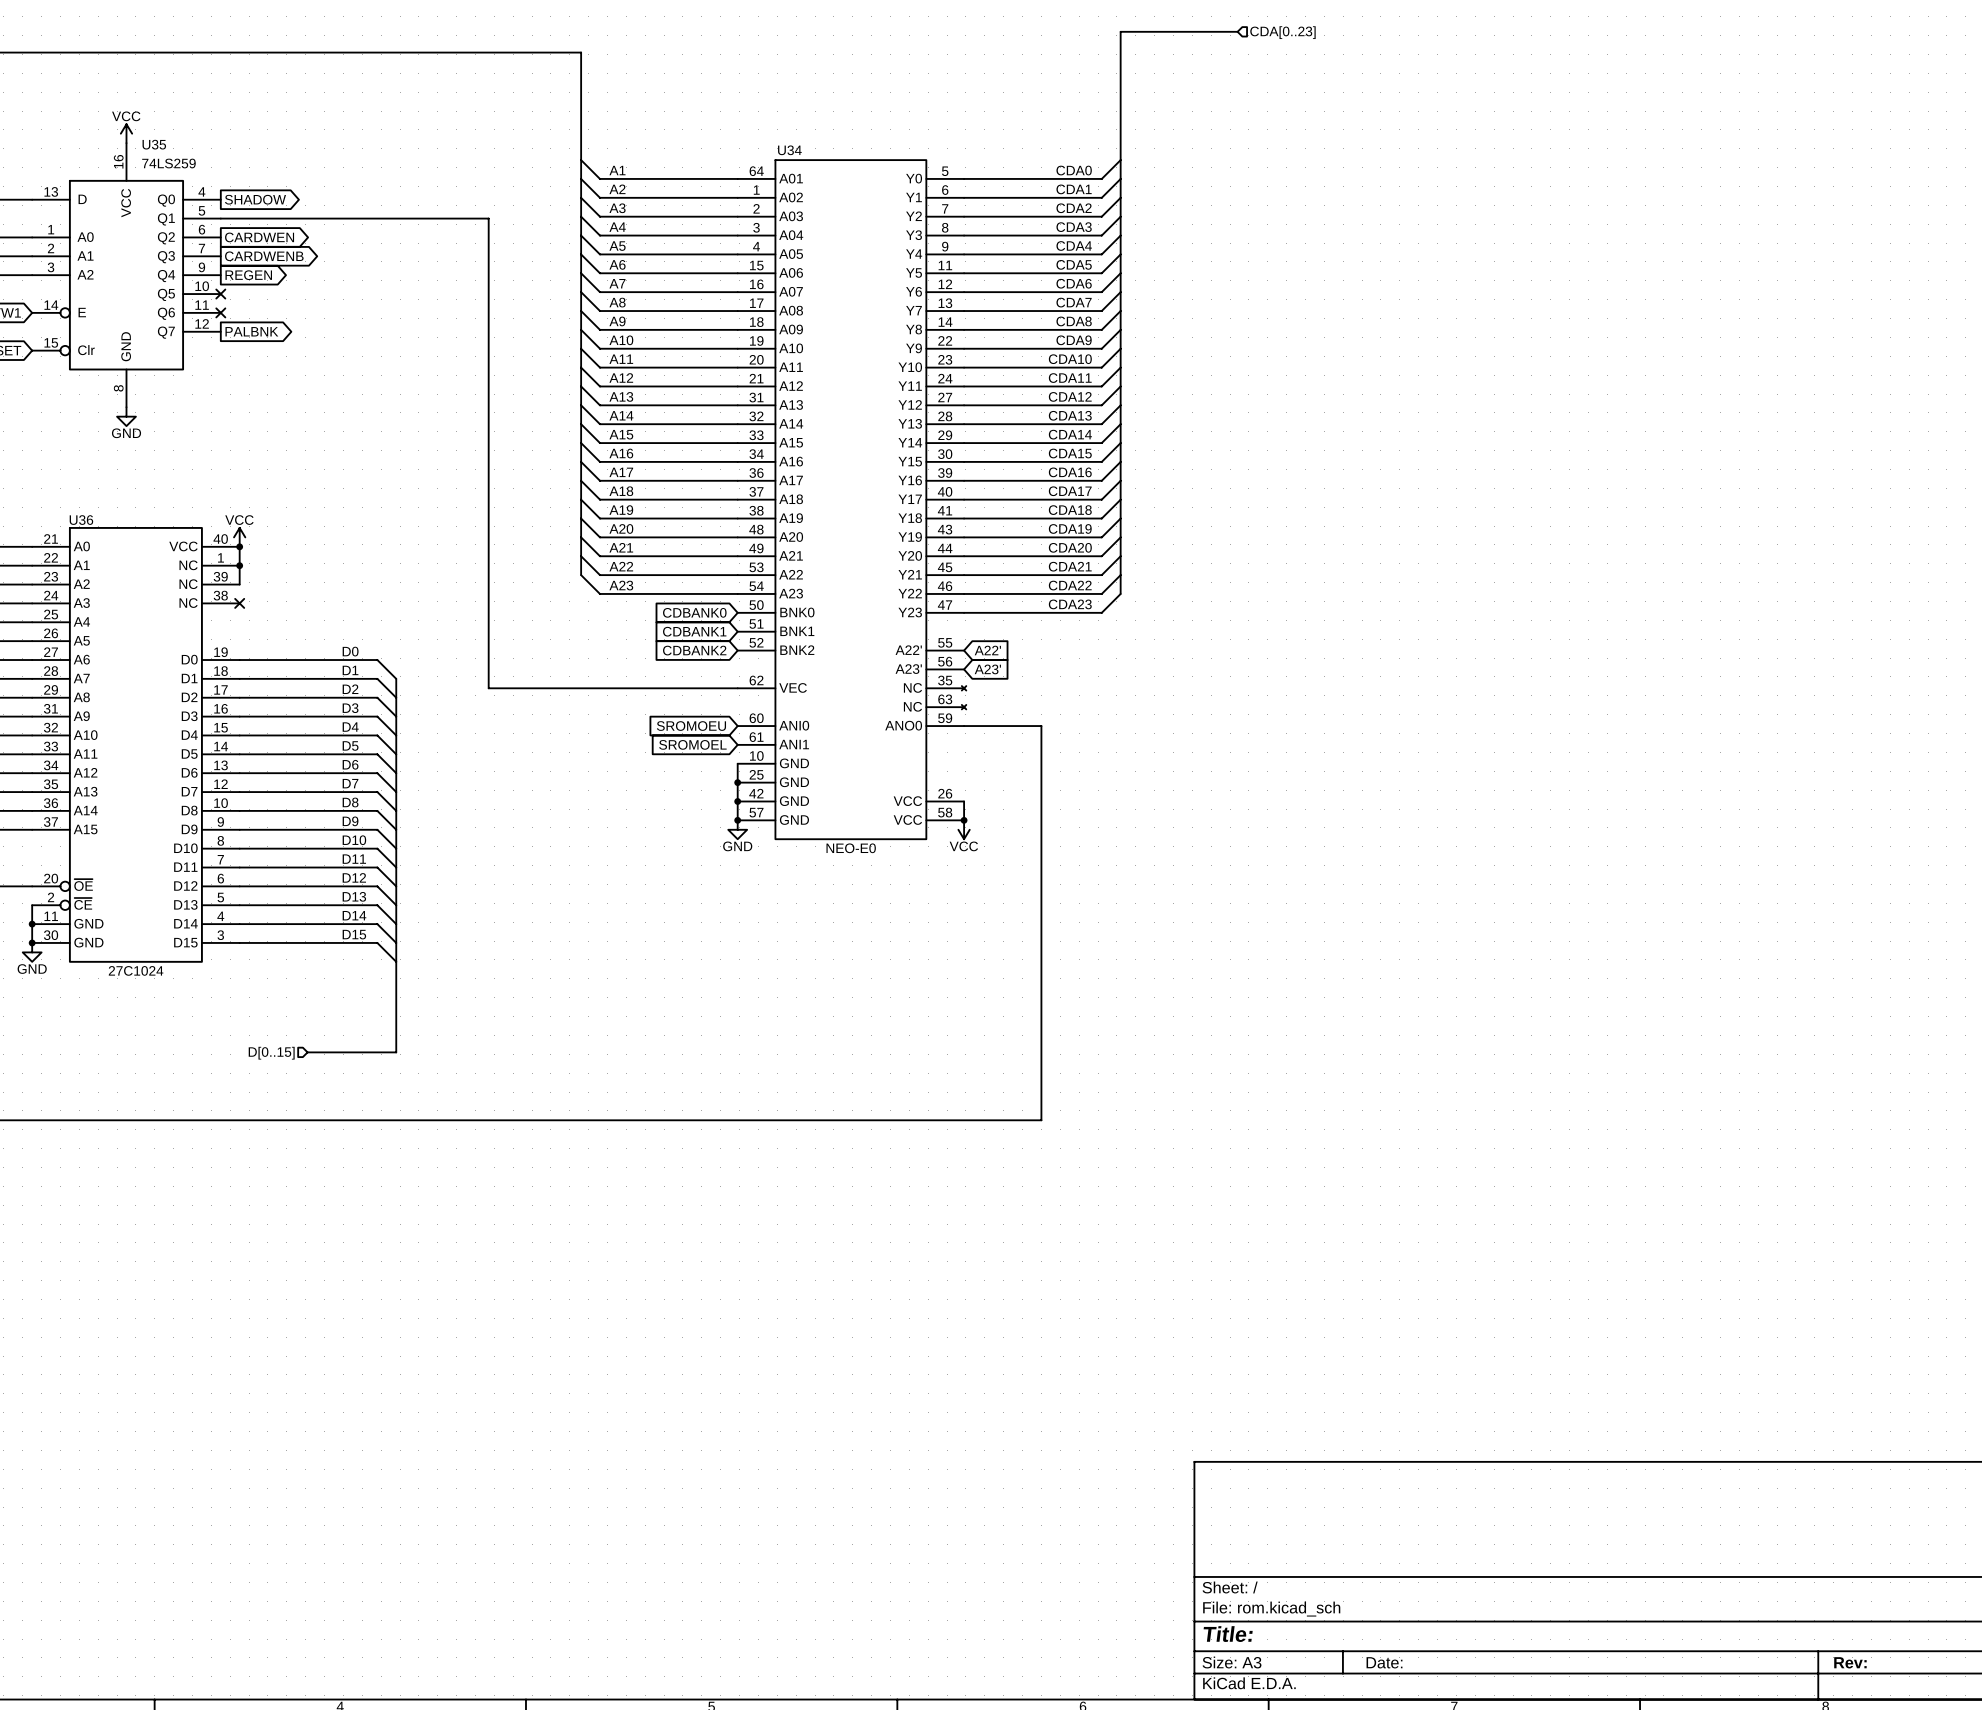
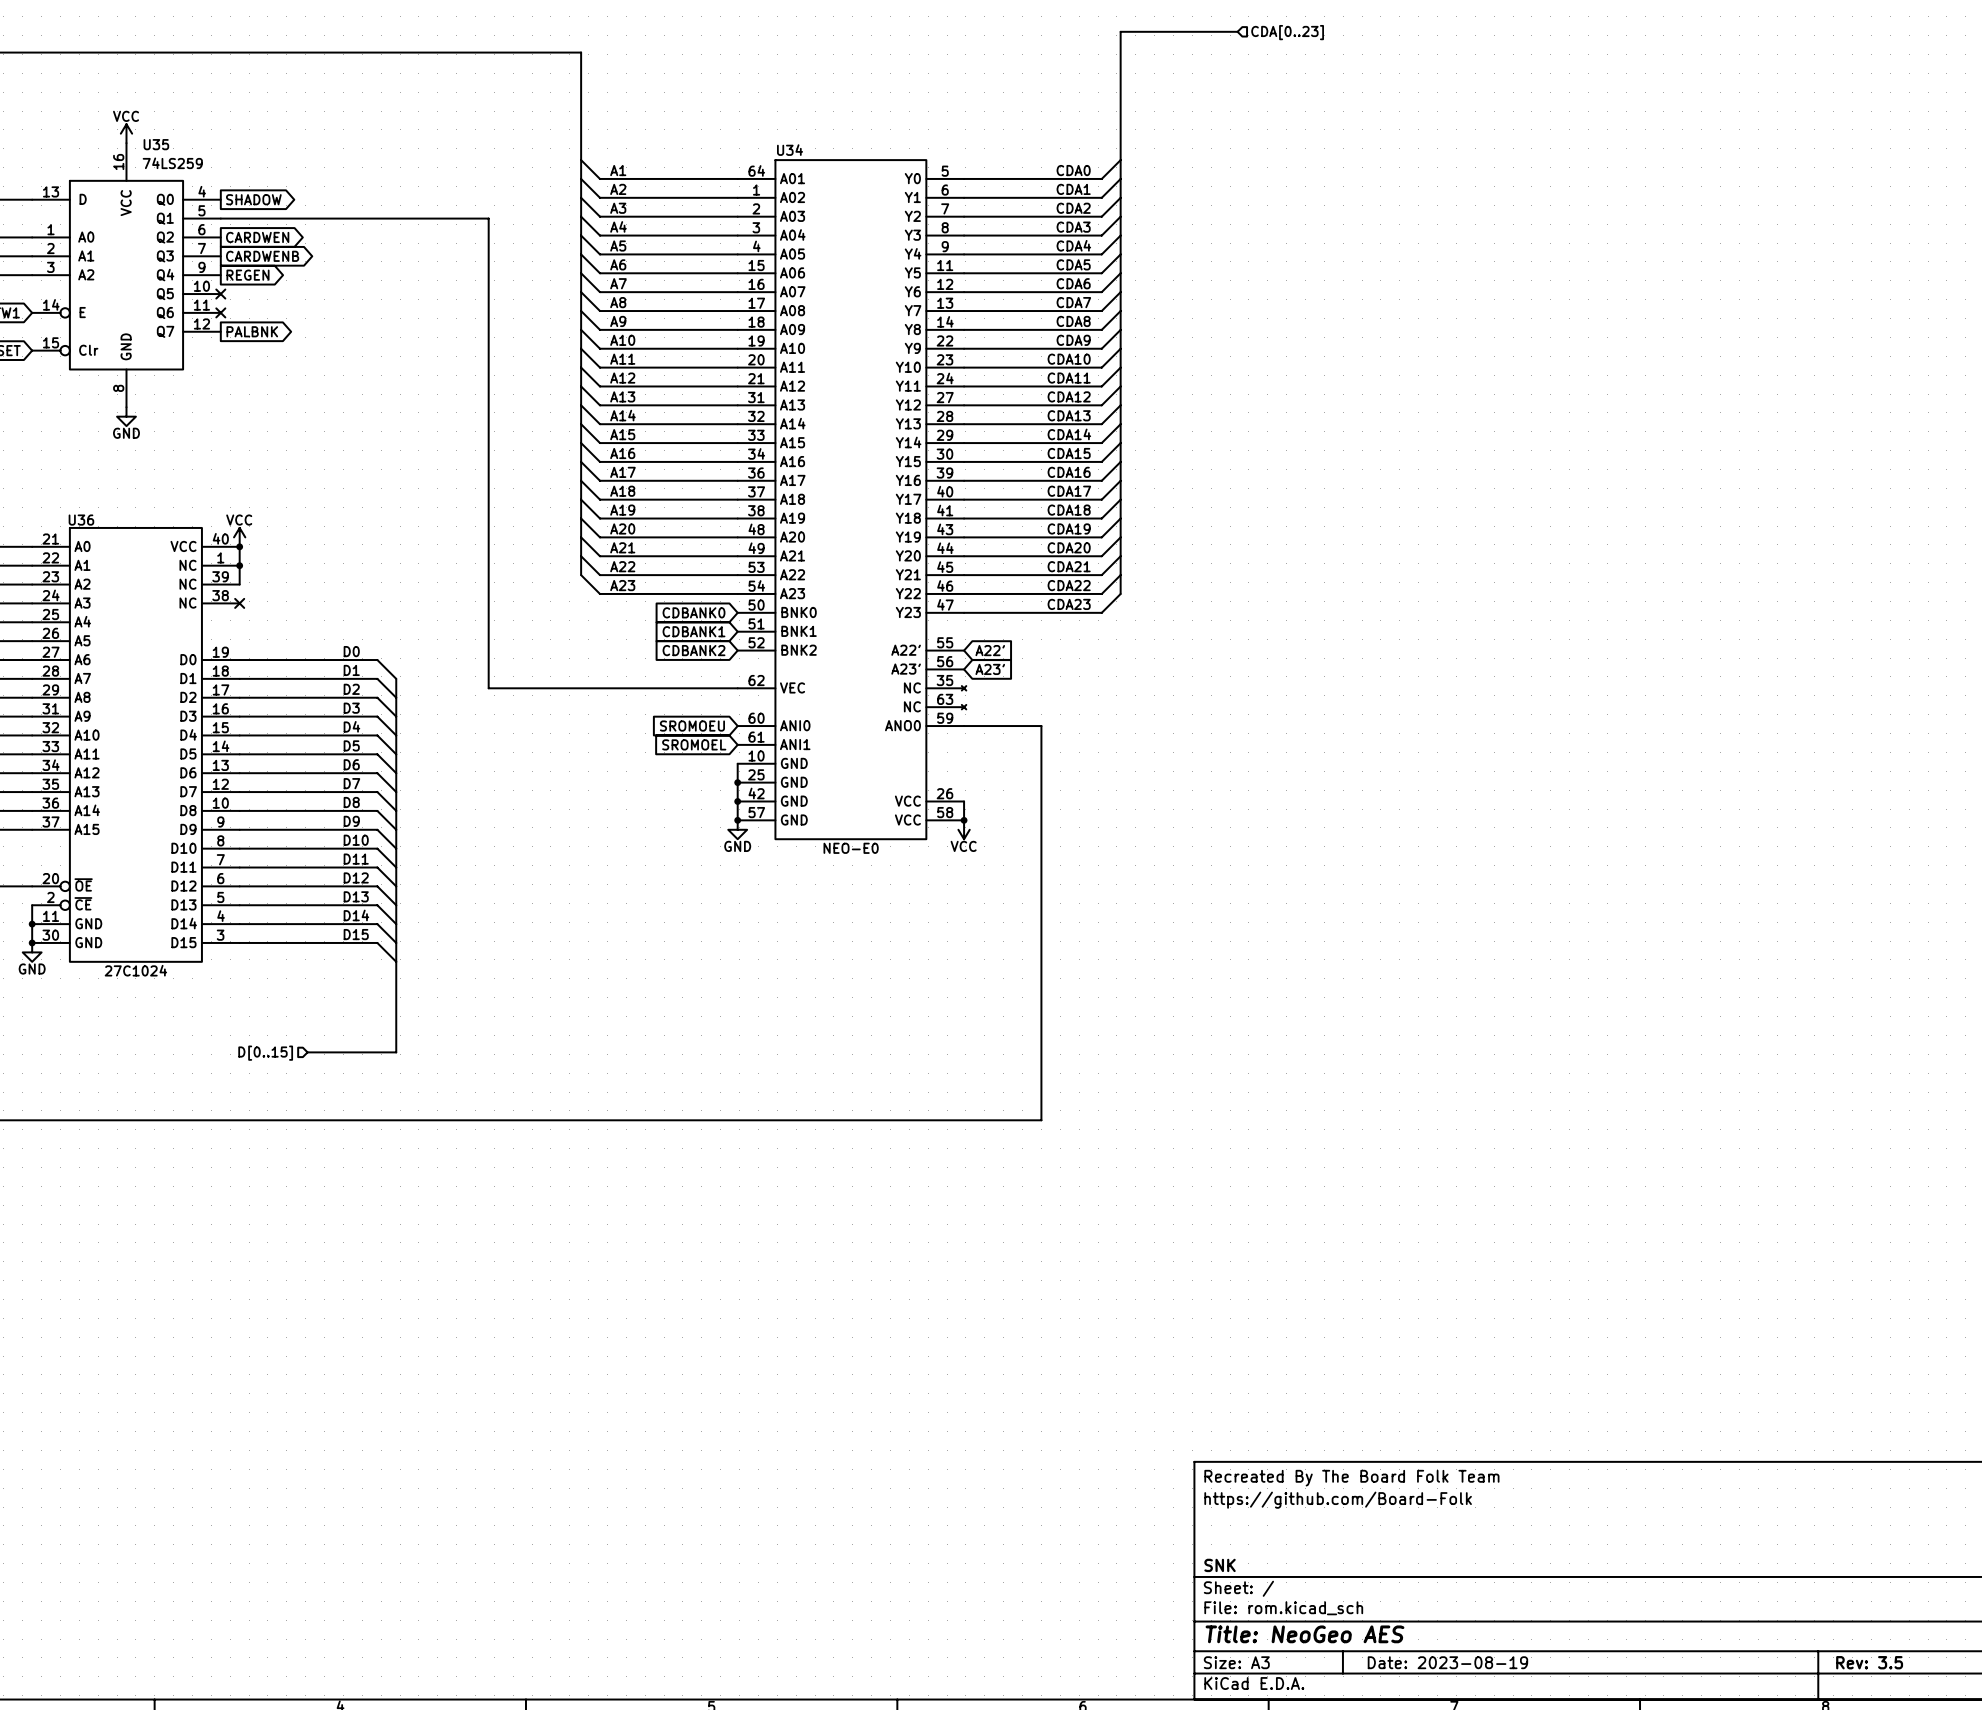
title block: none -> Recreated By The Board Folk Team (1351, 1478)
title block: none -> https://github.com/Board-Folk (1338, 1500)
title block: none -> SNK (1220, 1565)
title block: Title: (1228, 1634) -> Title: NeoGeo AES (1304, 1634)
title block: Date: (1384, 1662) -> Date: 2023-08-19 (1447, 1662)
title block: Rev: (1850, 1662) -> Rev: 3.5 (1869, 1662)

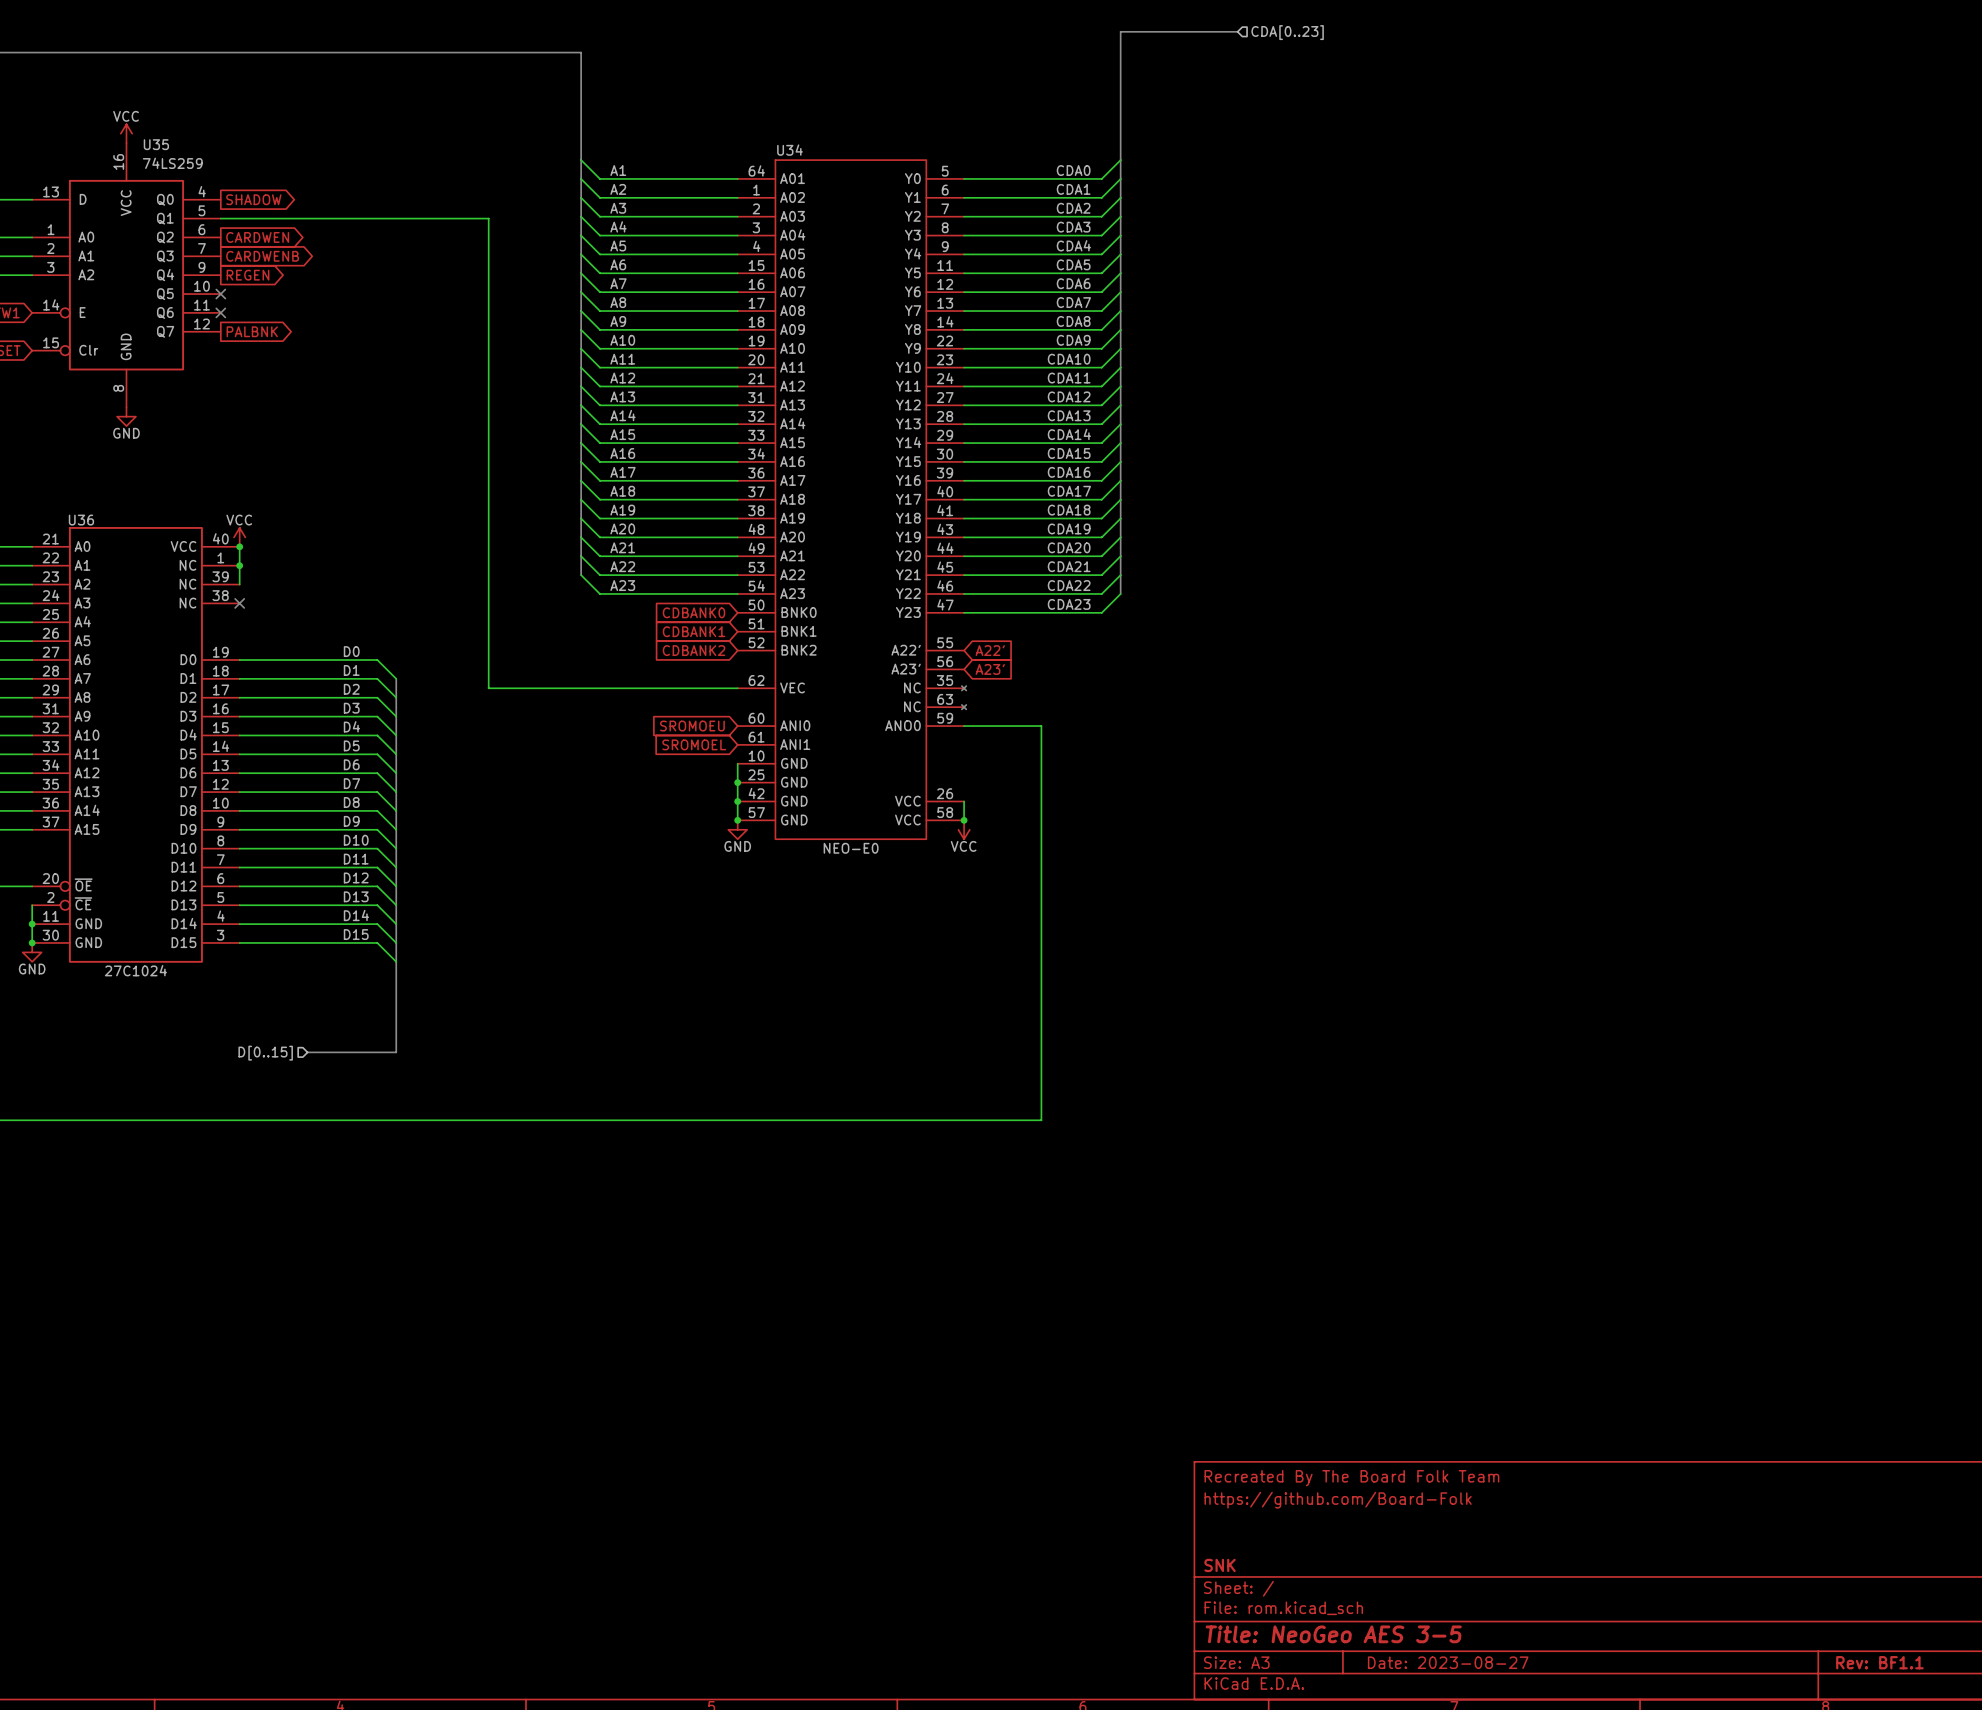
title block: Title: NeoGeo AES (1304, 1634) -> Title: NeoGeo AES 3-5 (1333, 1634)
title block: Date: 2023-08-19 (1447, 1662) -> Date: 2023-08-27 (1448, 1662)
title block: Rev: 3.5 (1869, 1662) -> Rev: BF1.1 (1879, 1662)

